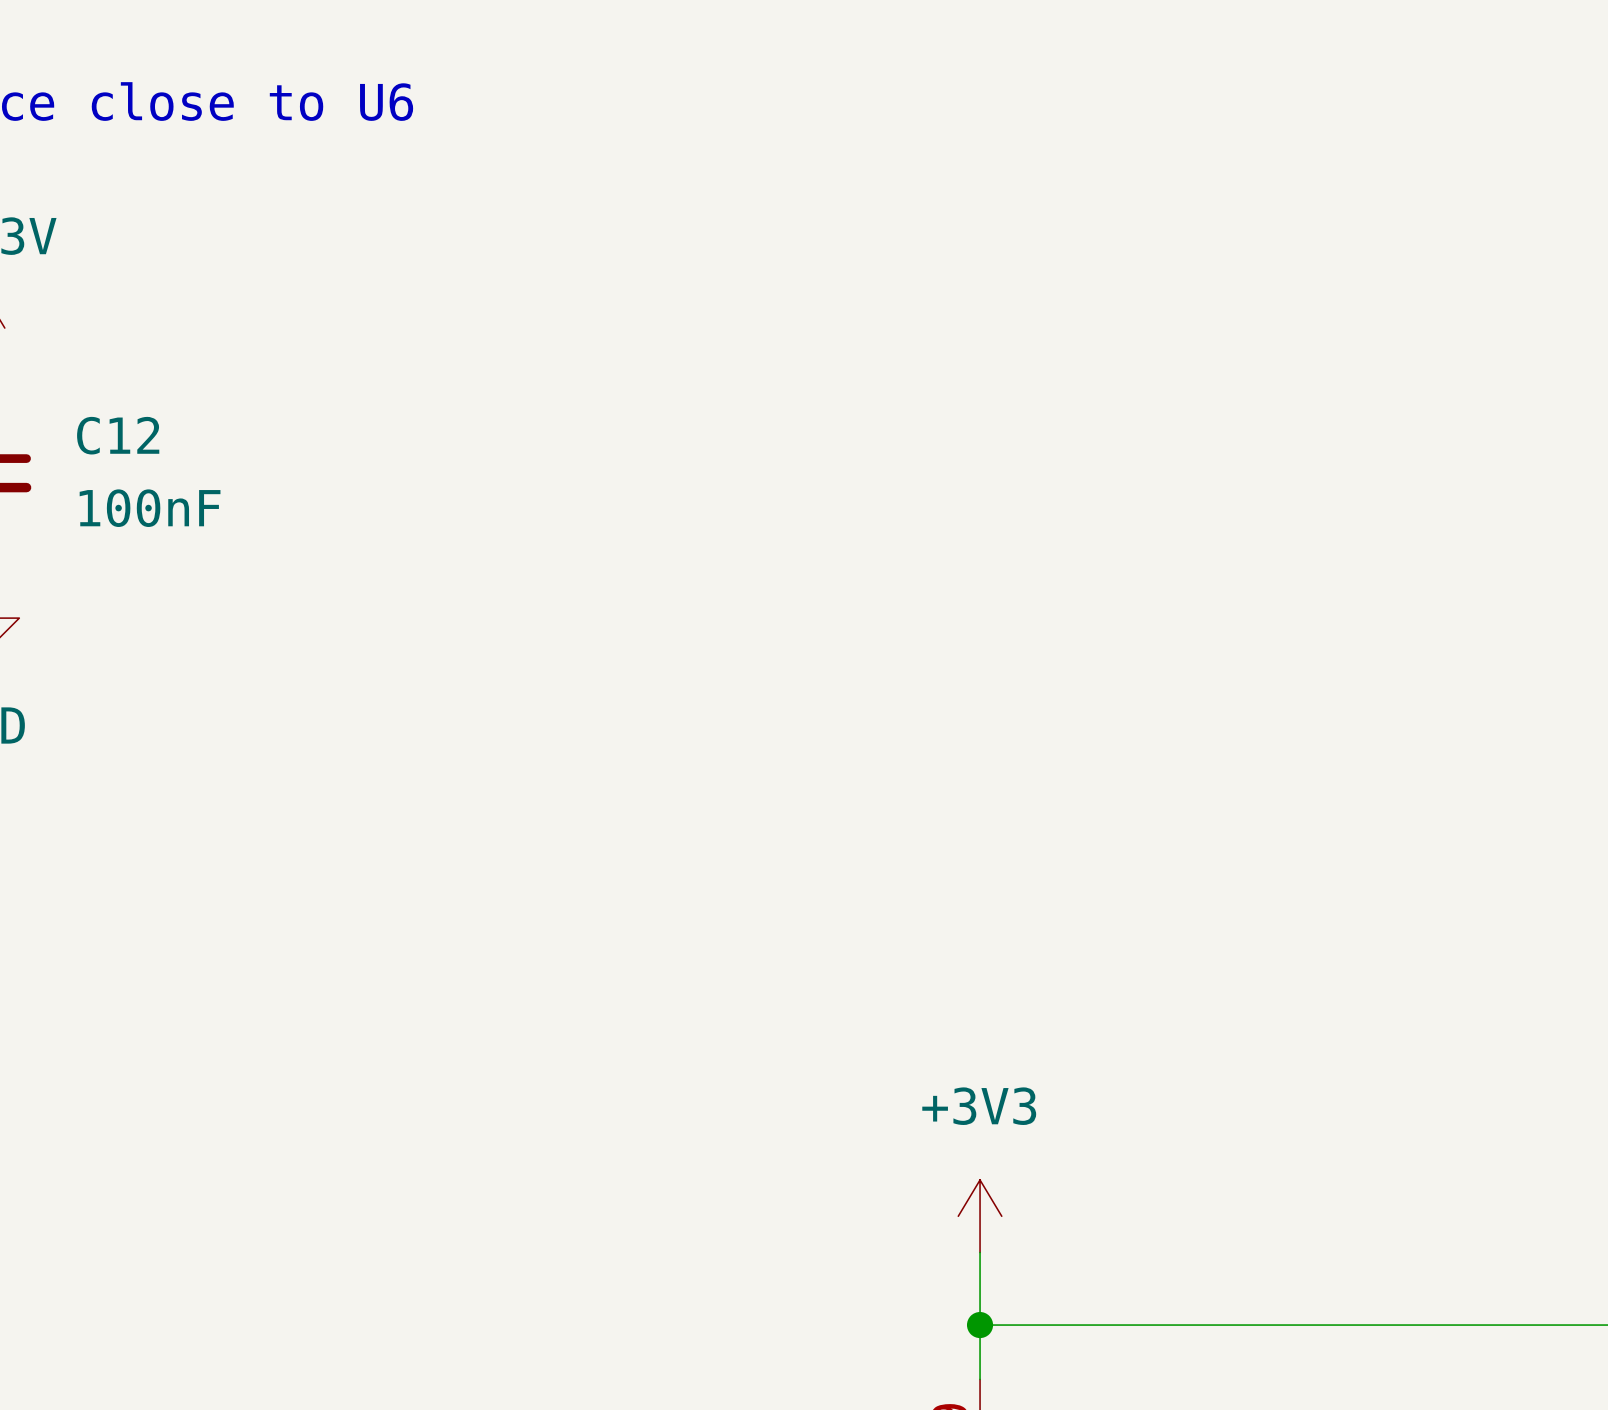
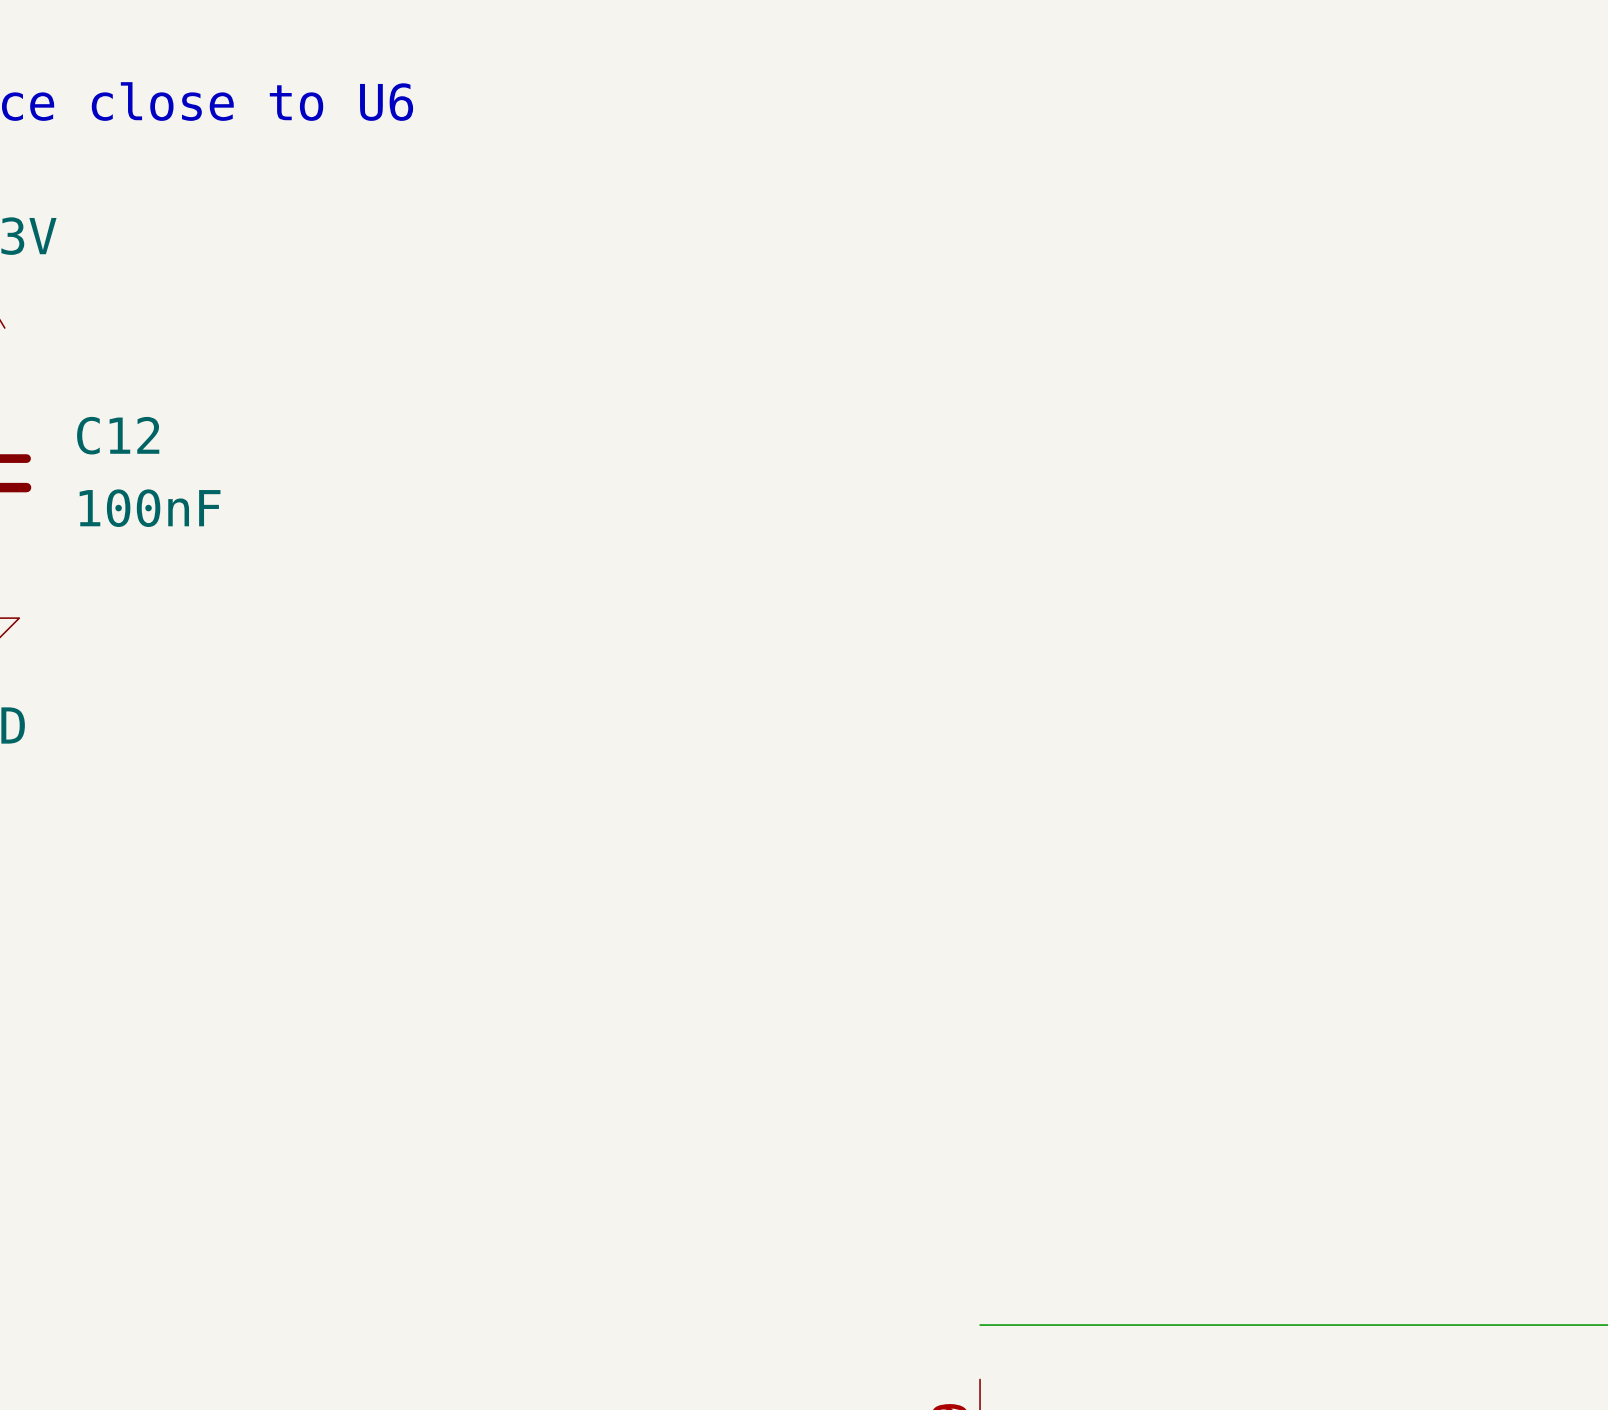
power symbol: +3V3 (980, 1216) -> none
wire: (980, 1252) (980, 1379) -> none
junction: (980, 1325) -> none

